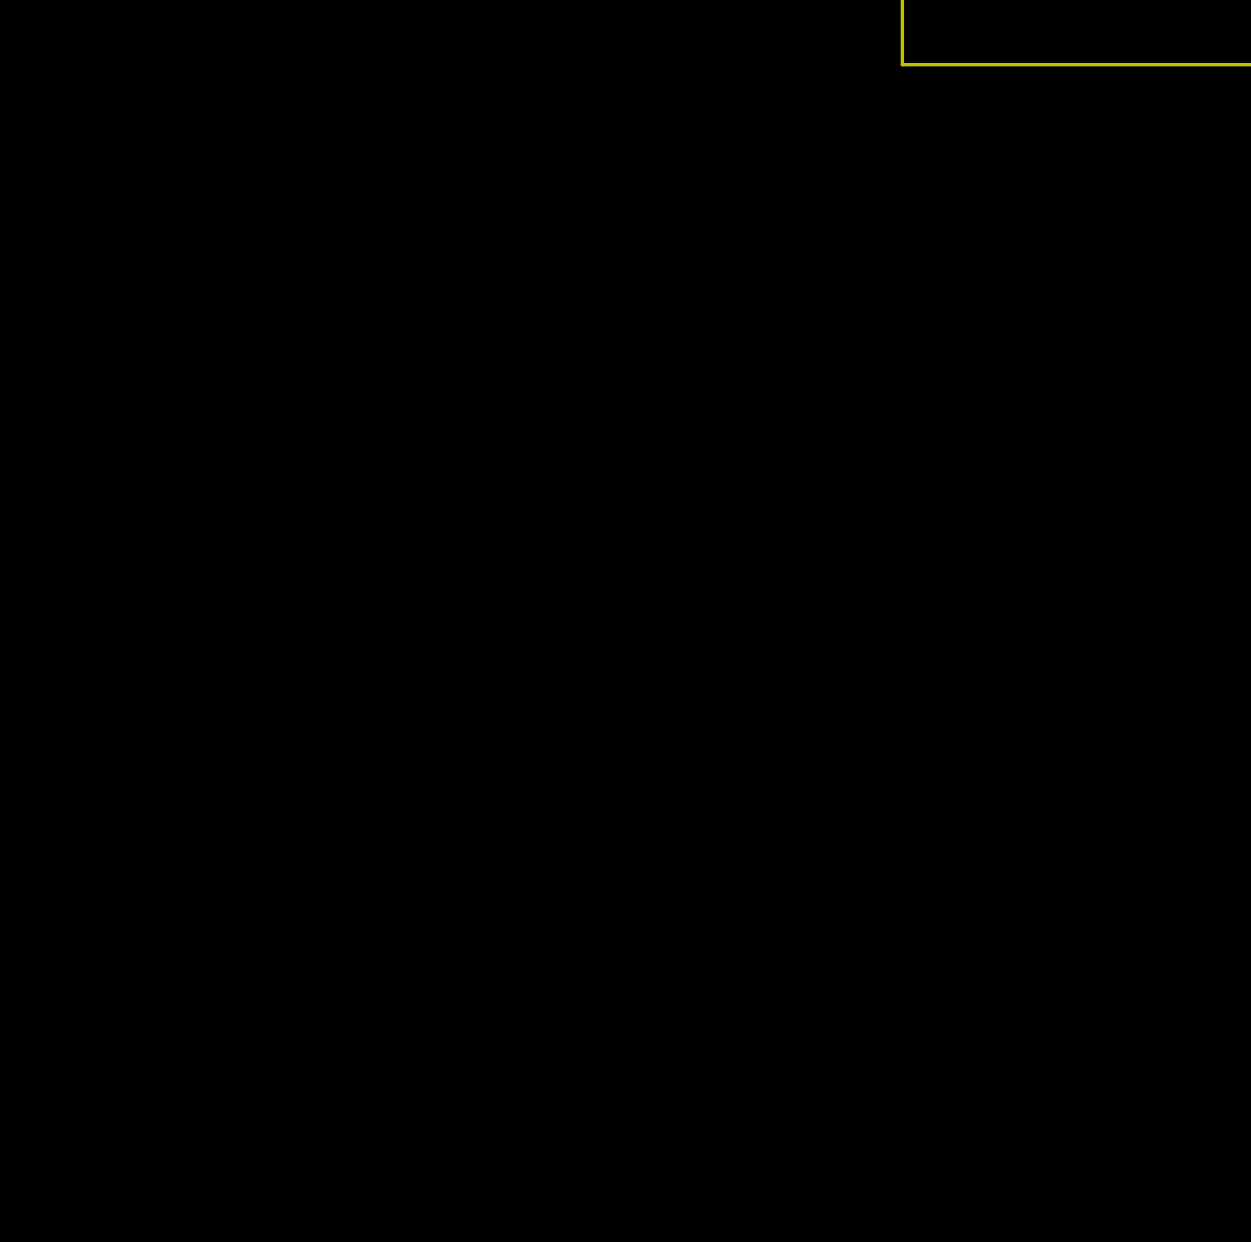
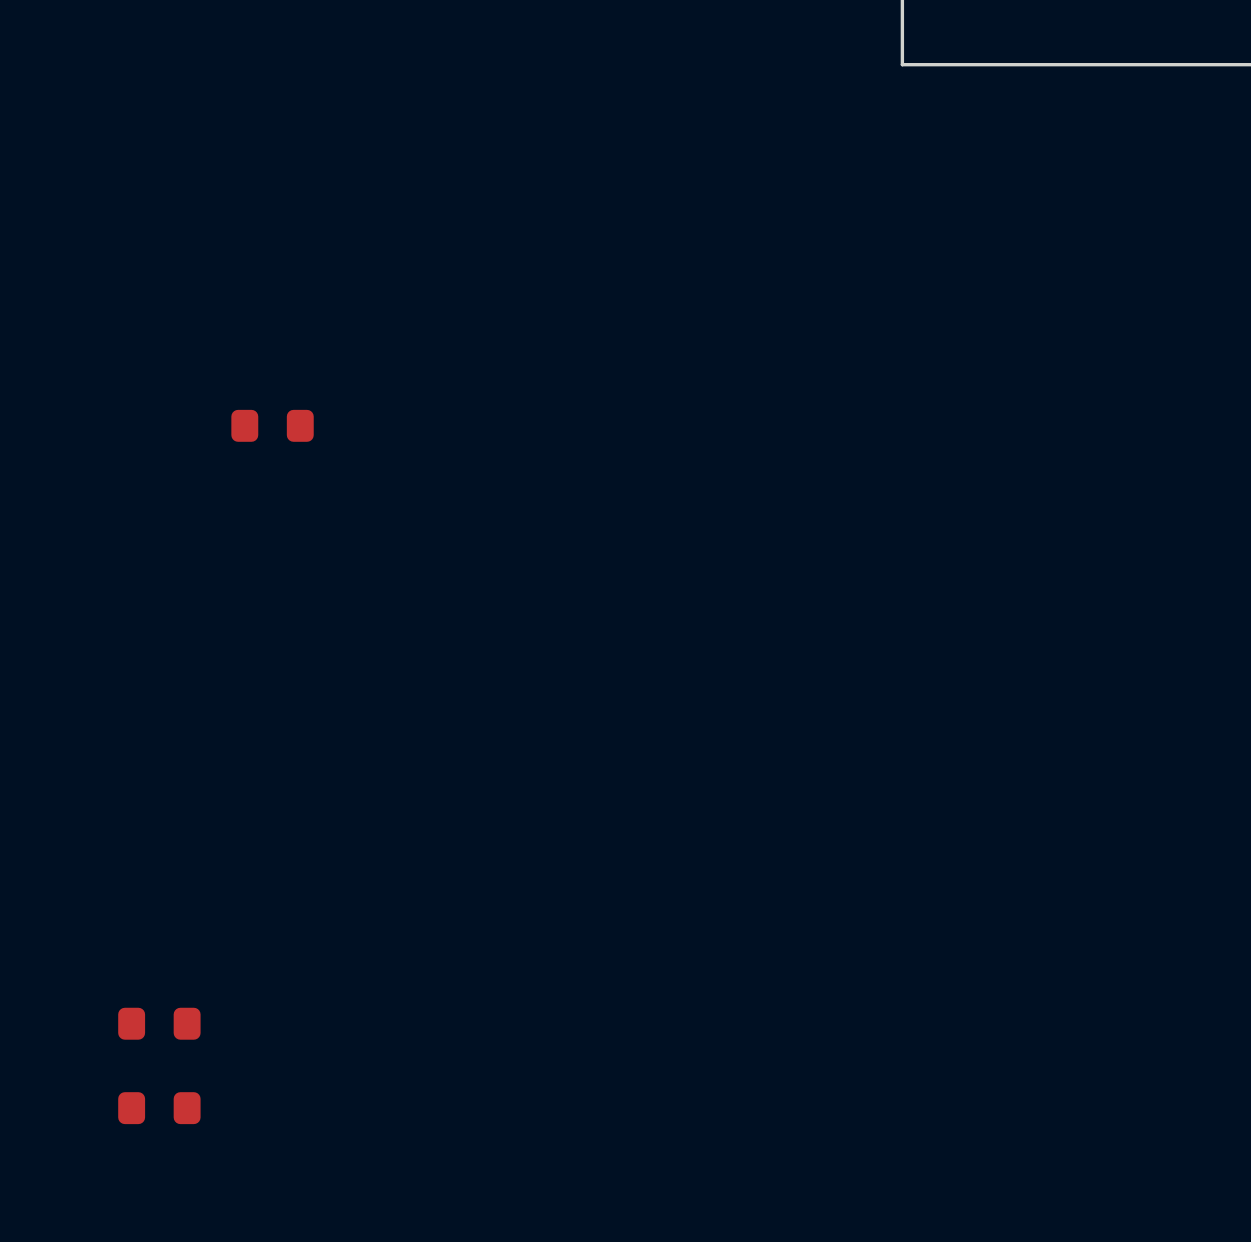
part: none -> (272, 425)
part: none -> (159, 1023)
part: none -> (159, 1108)

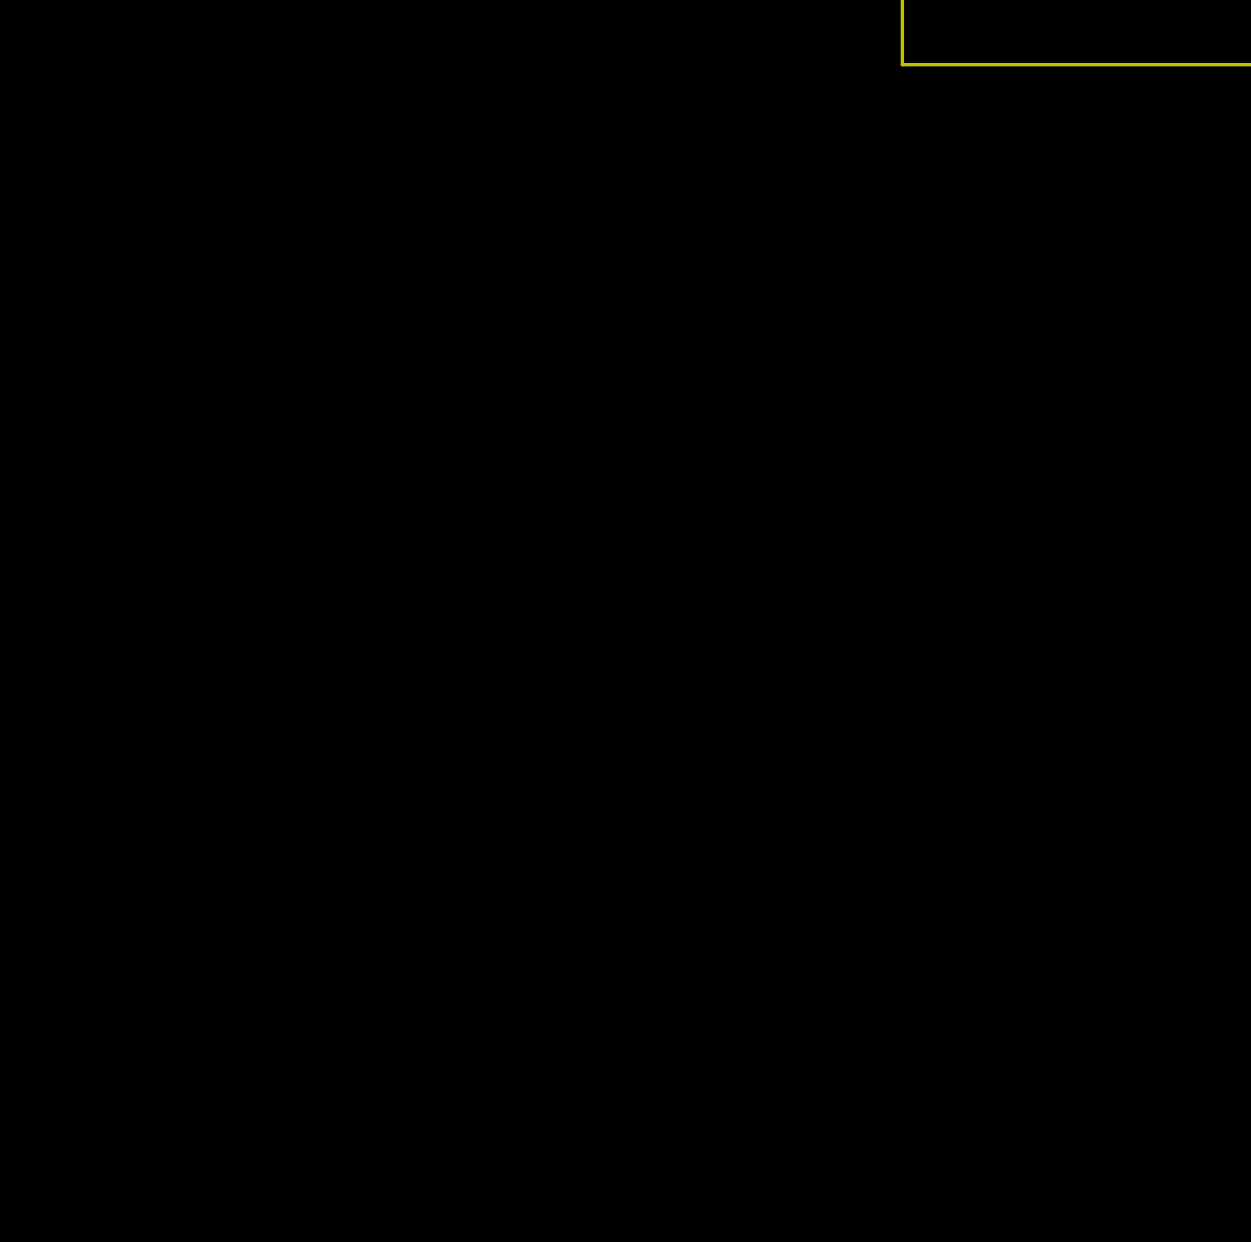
part: (272, 425) -> none
part: (159, 1023) -> none
part: (159, 1108) -> none

